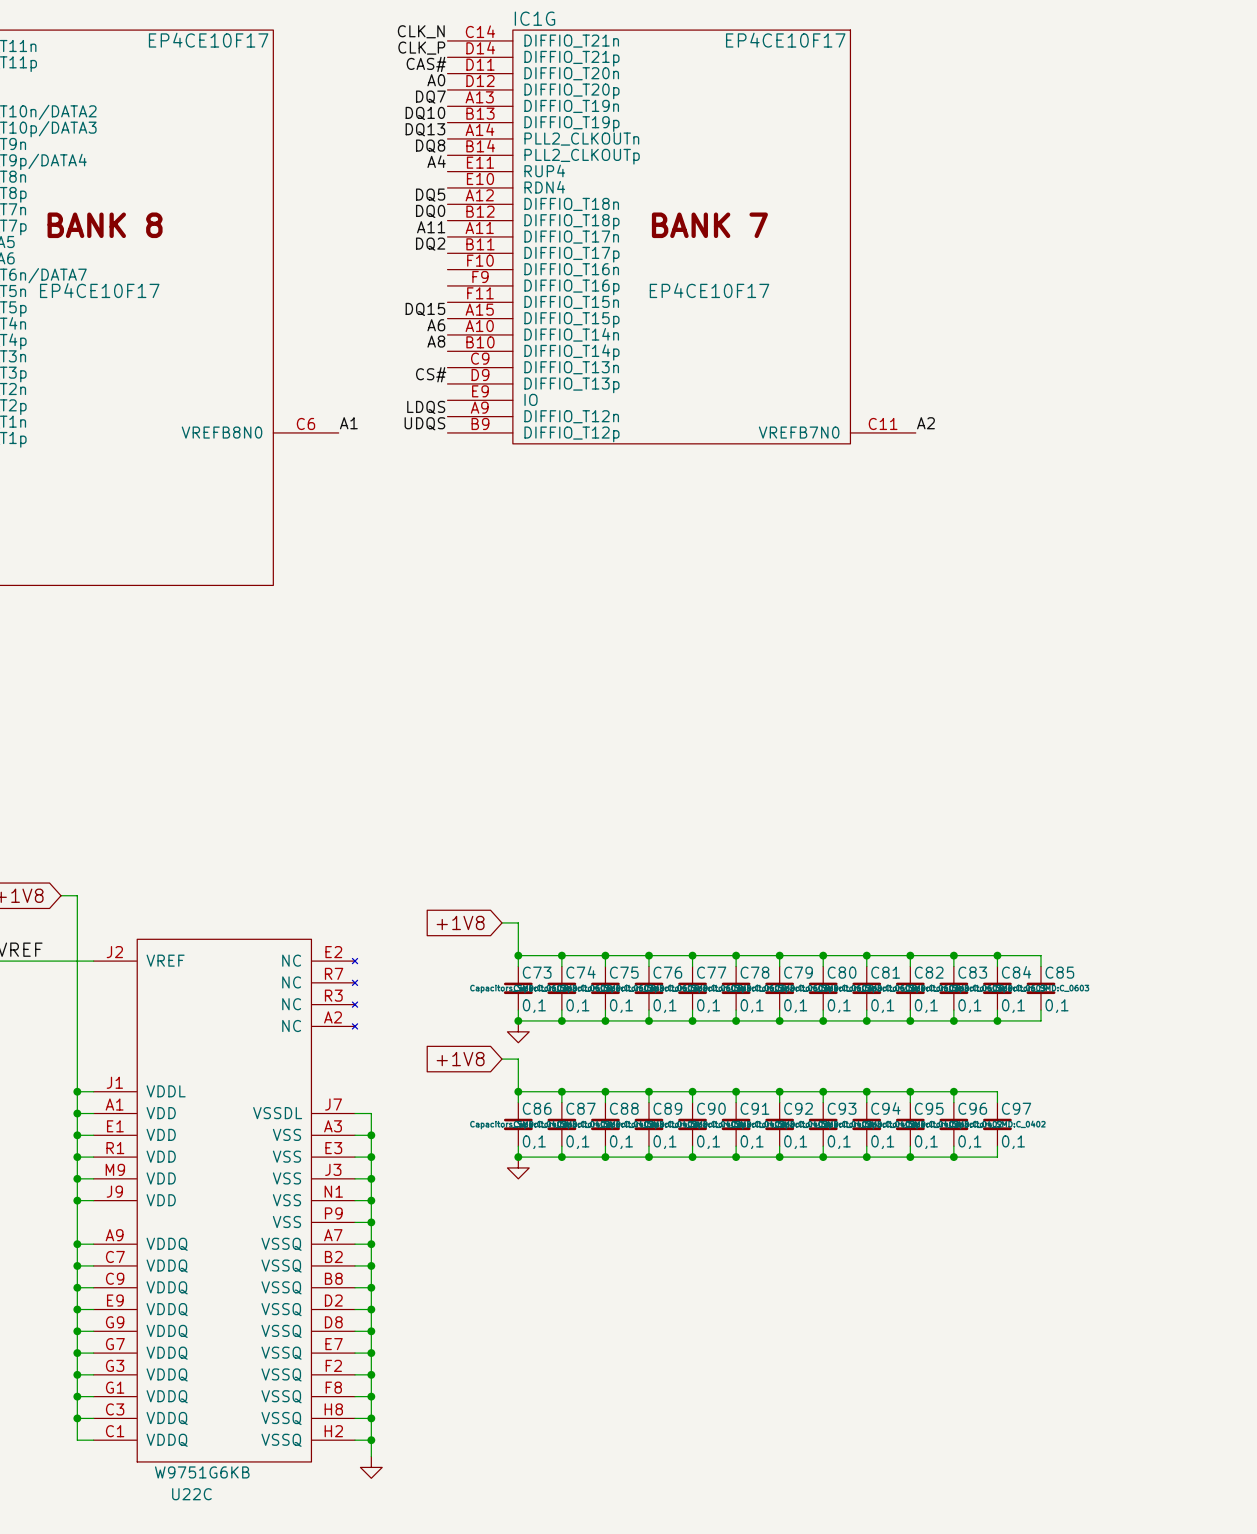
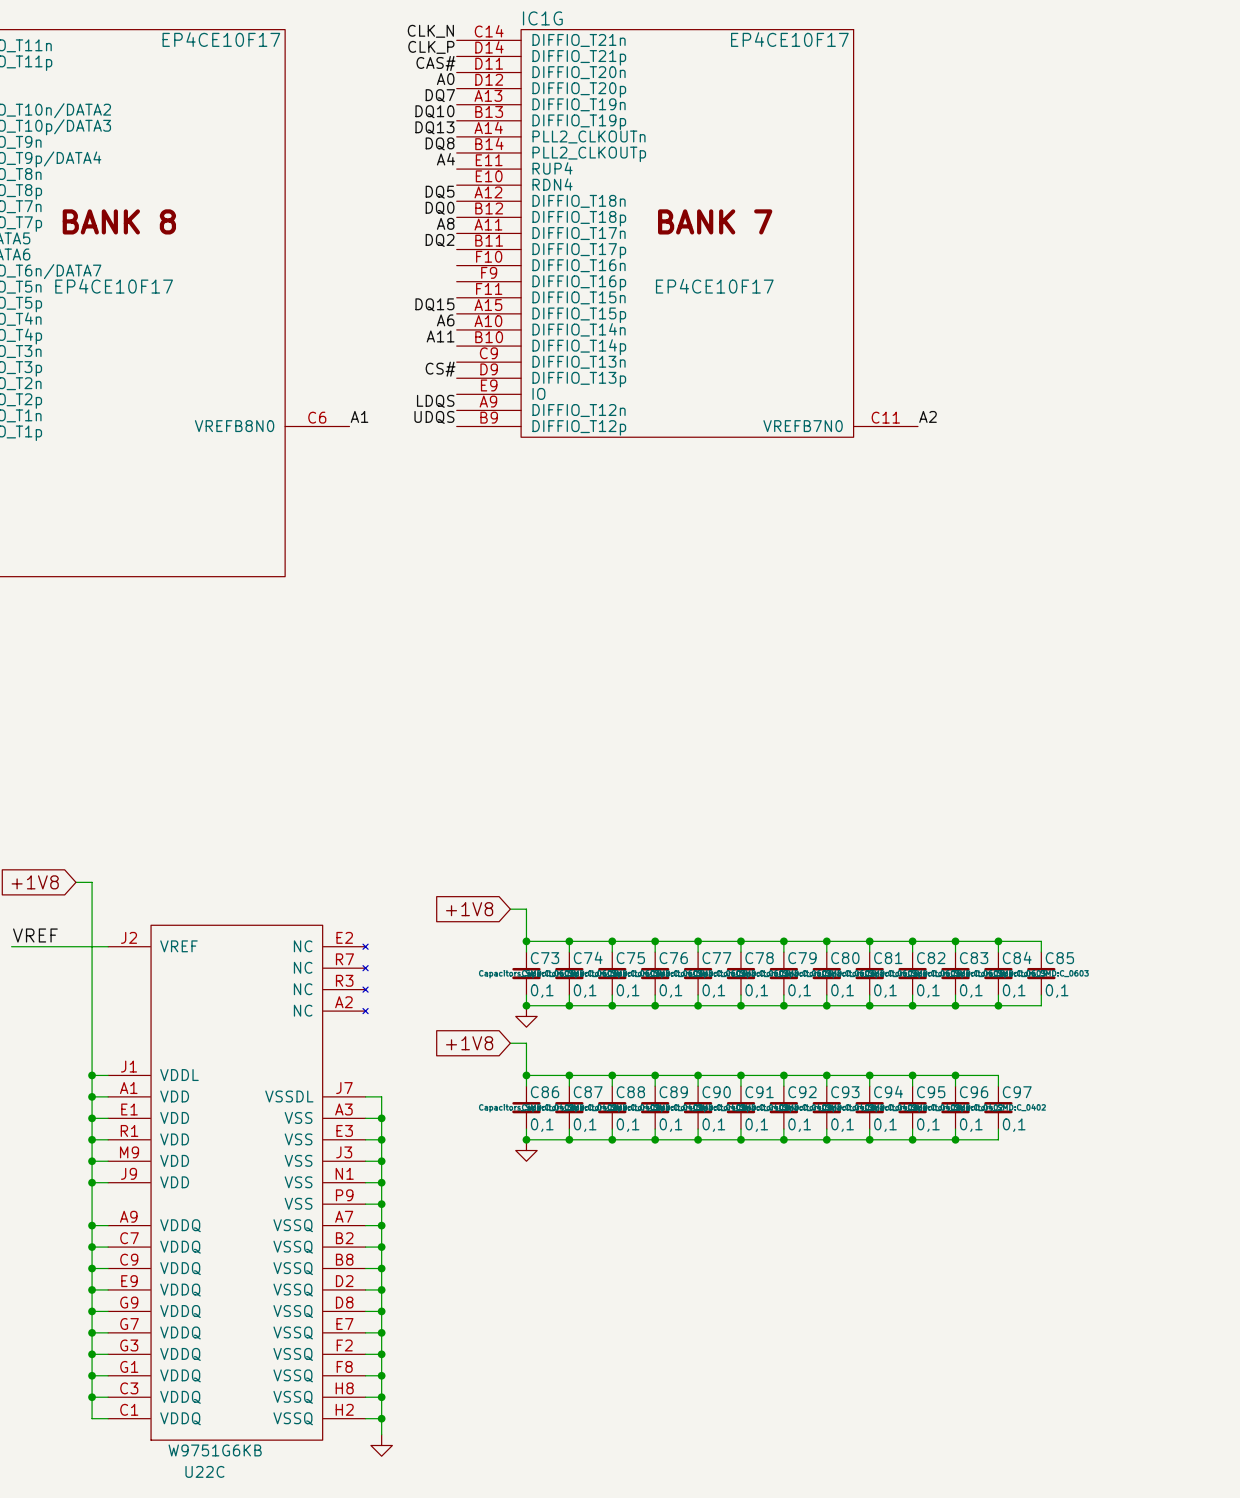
label: A11 (431, 227) -> A8 (445, 223)
label: A8 (436, 341) -> A11 (440, 336)

